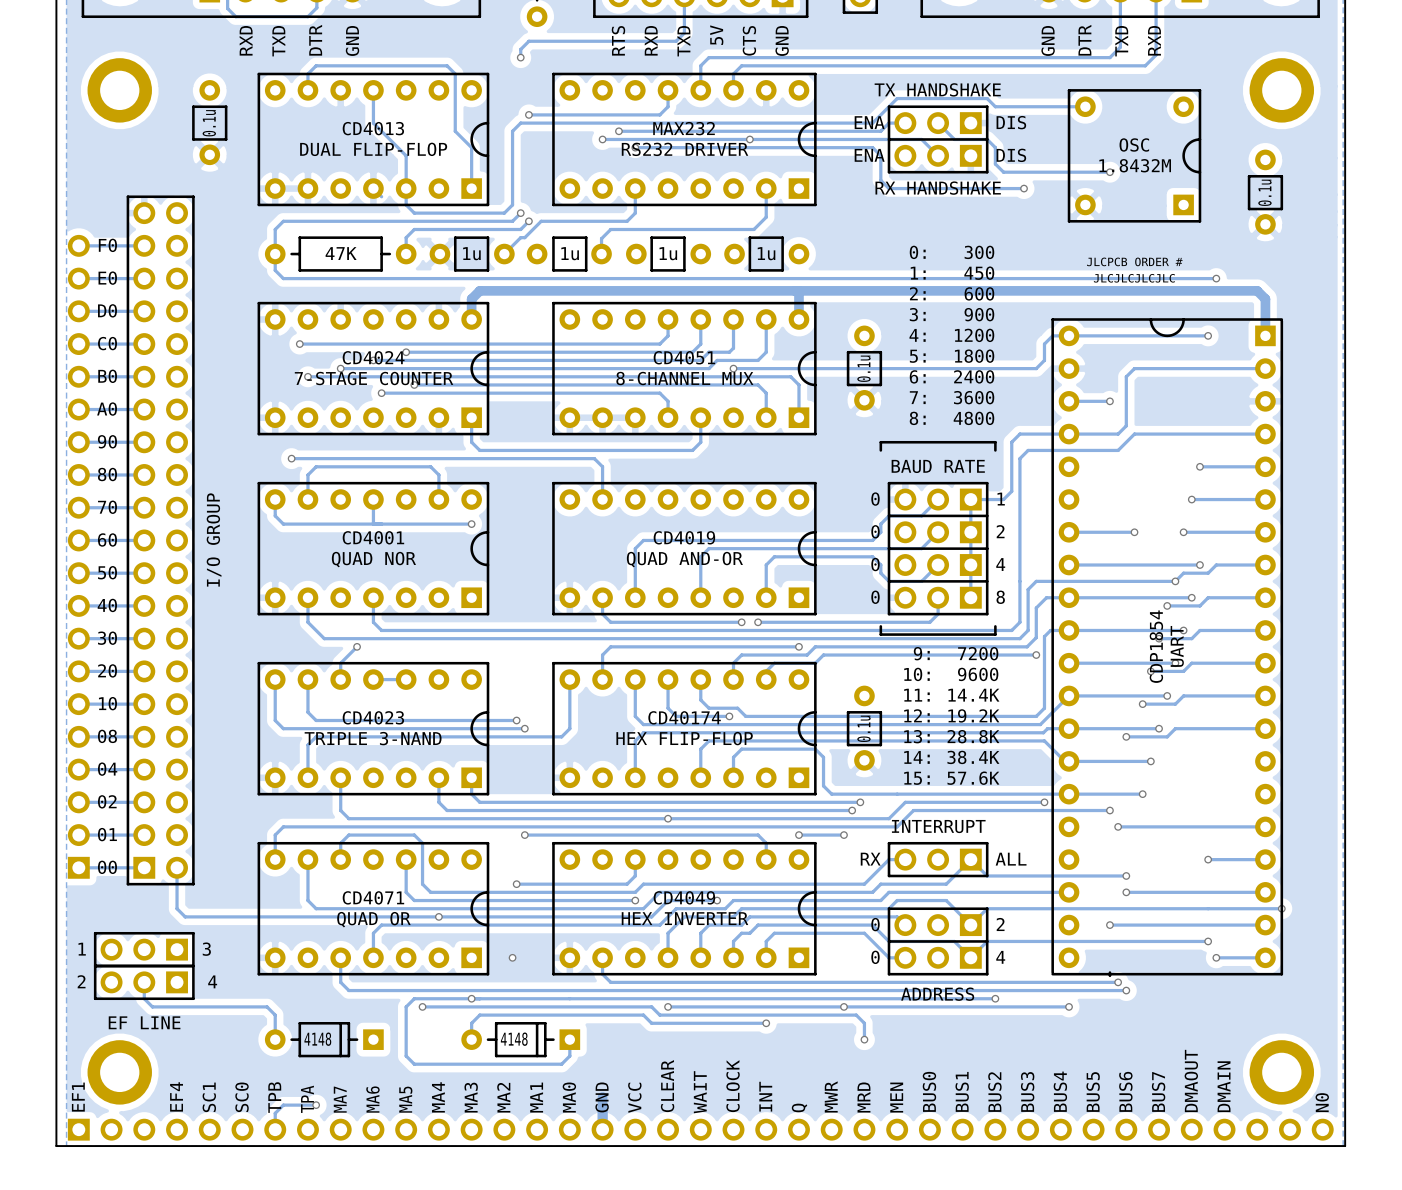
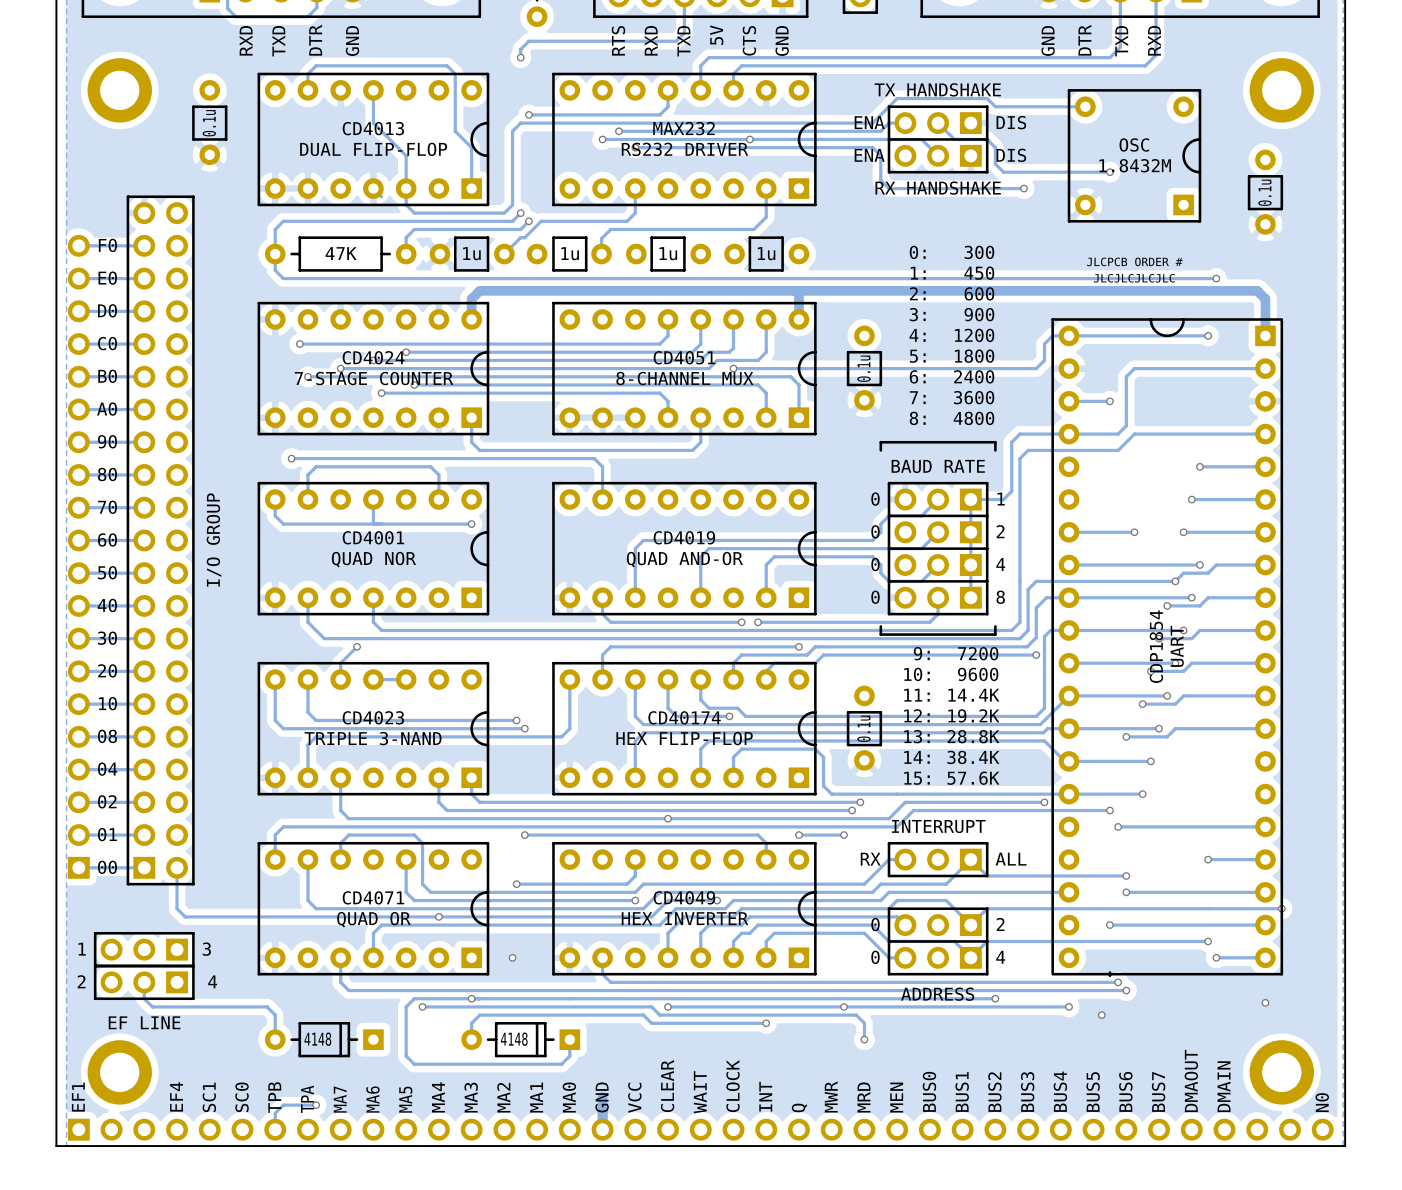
via: none -> (1265, 1002)
via: none -> (1101, 1015)

